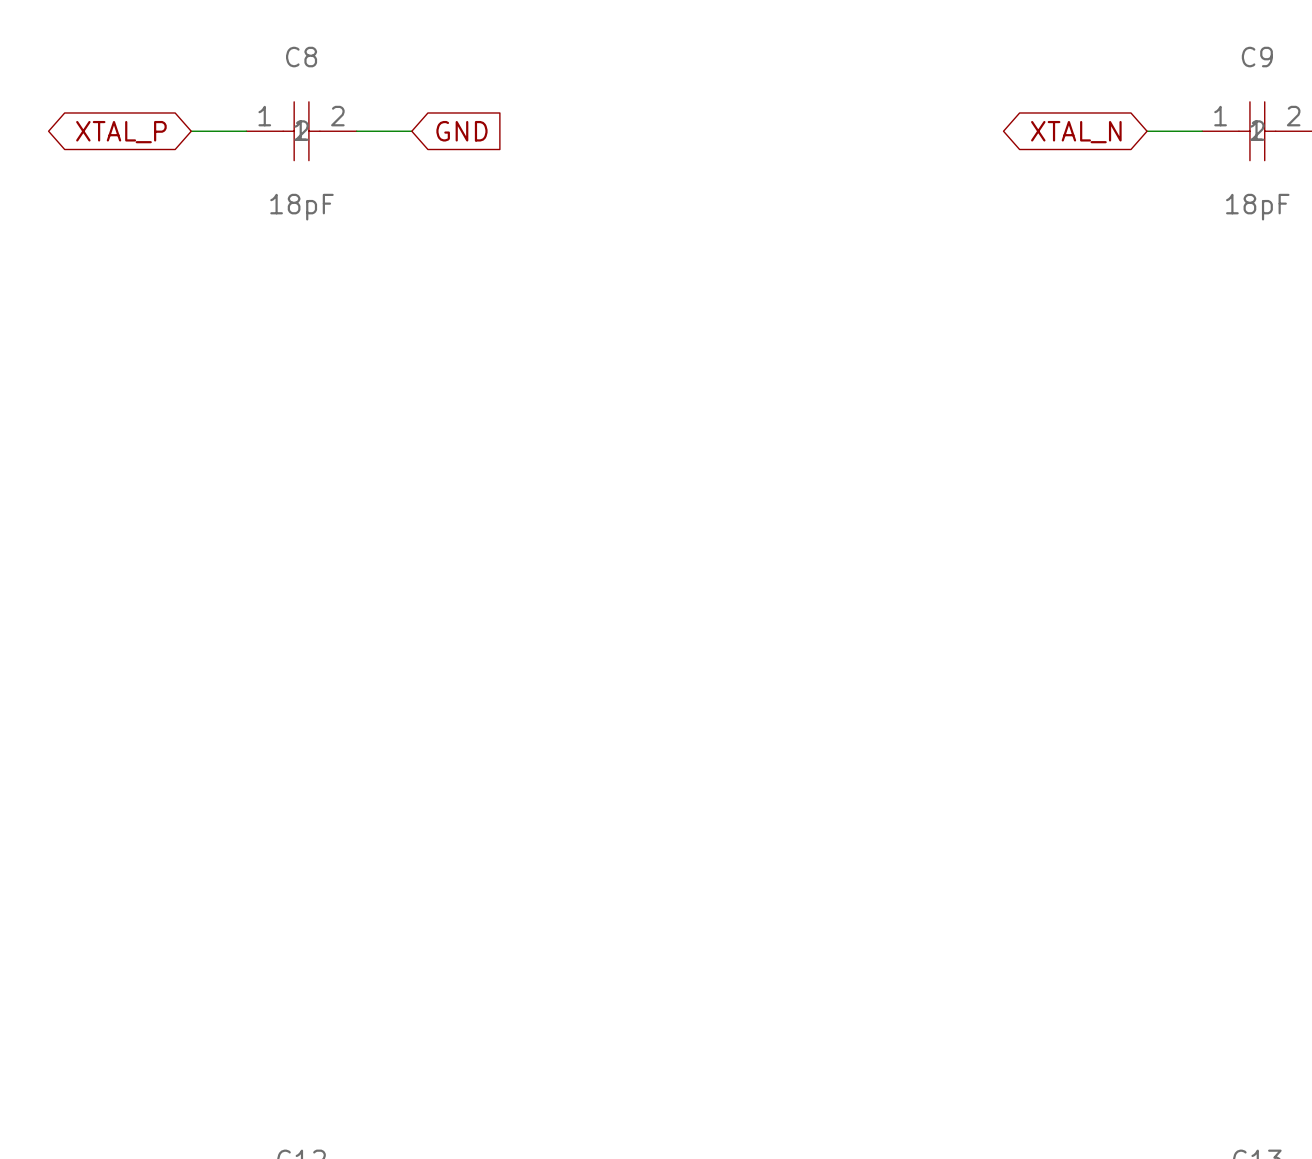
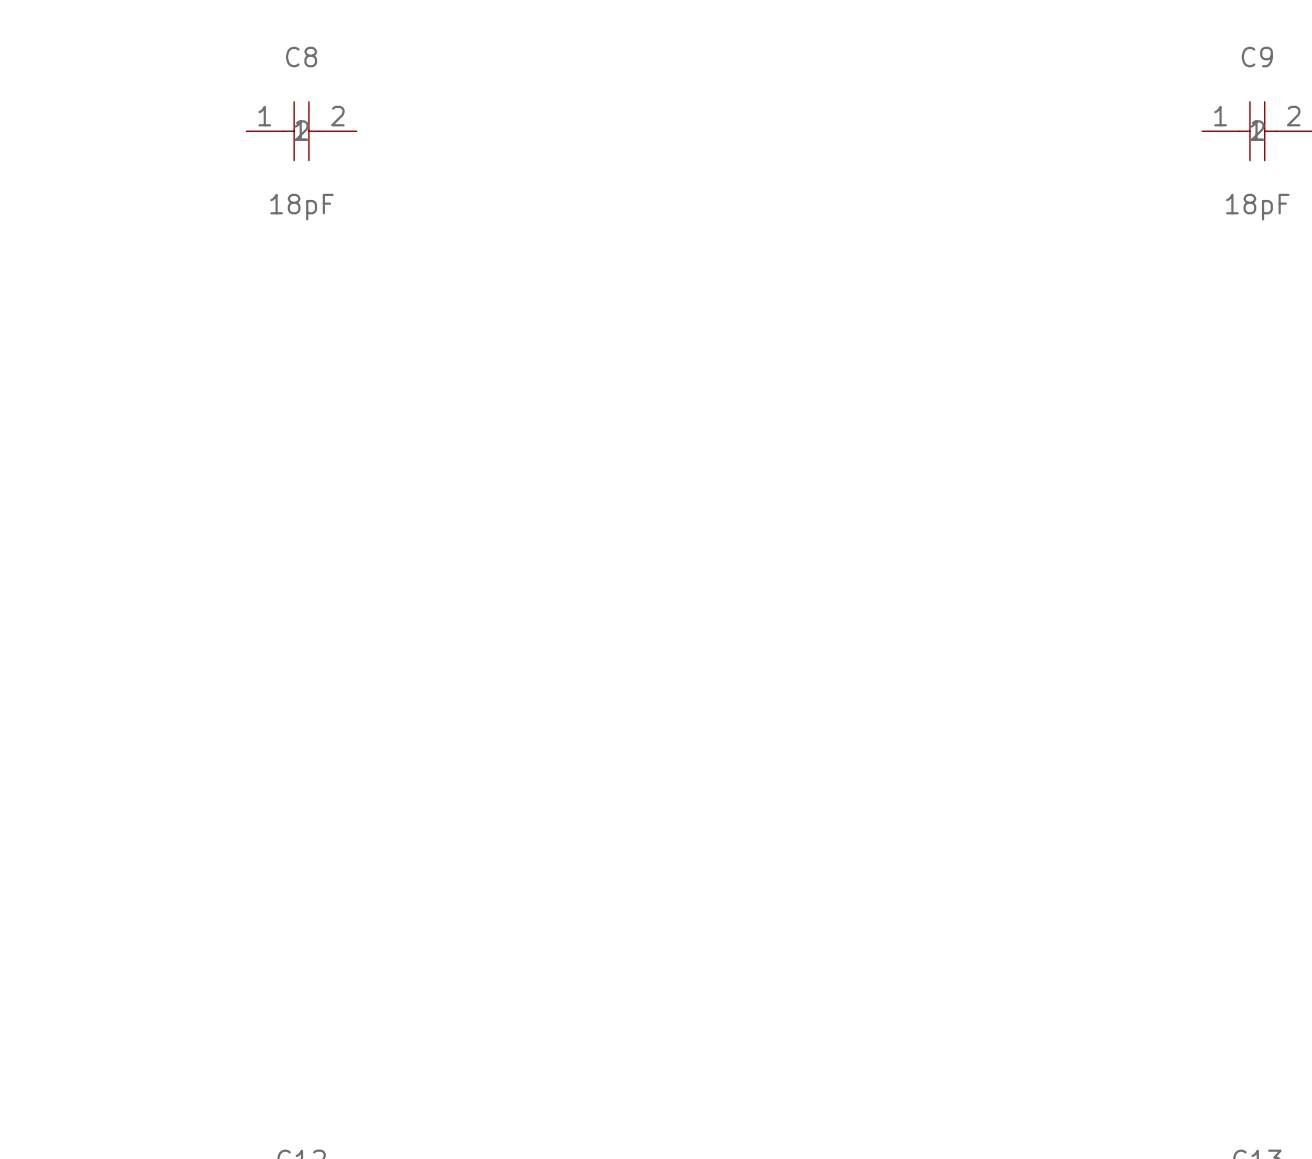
wire: (191, 131) (246, 131) -> none
wire: (356, 131) (411, 131) -> none
global label: GND (461, 131) -> none
wire: (1147, 131) (1202, 131) -> none
global label: XTAL_P (121, 132) -> none
global label: XTAL_N (1076, 132) -> none

